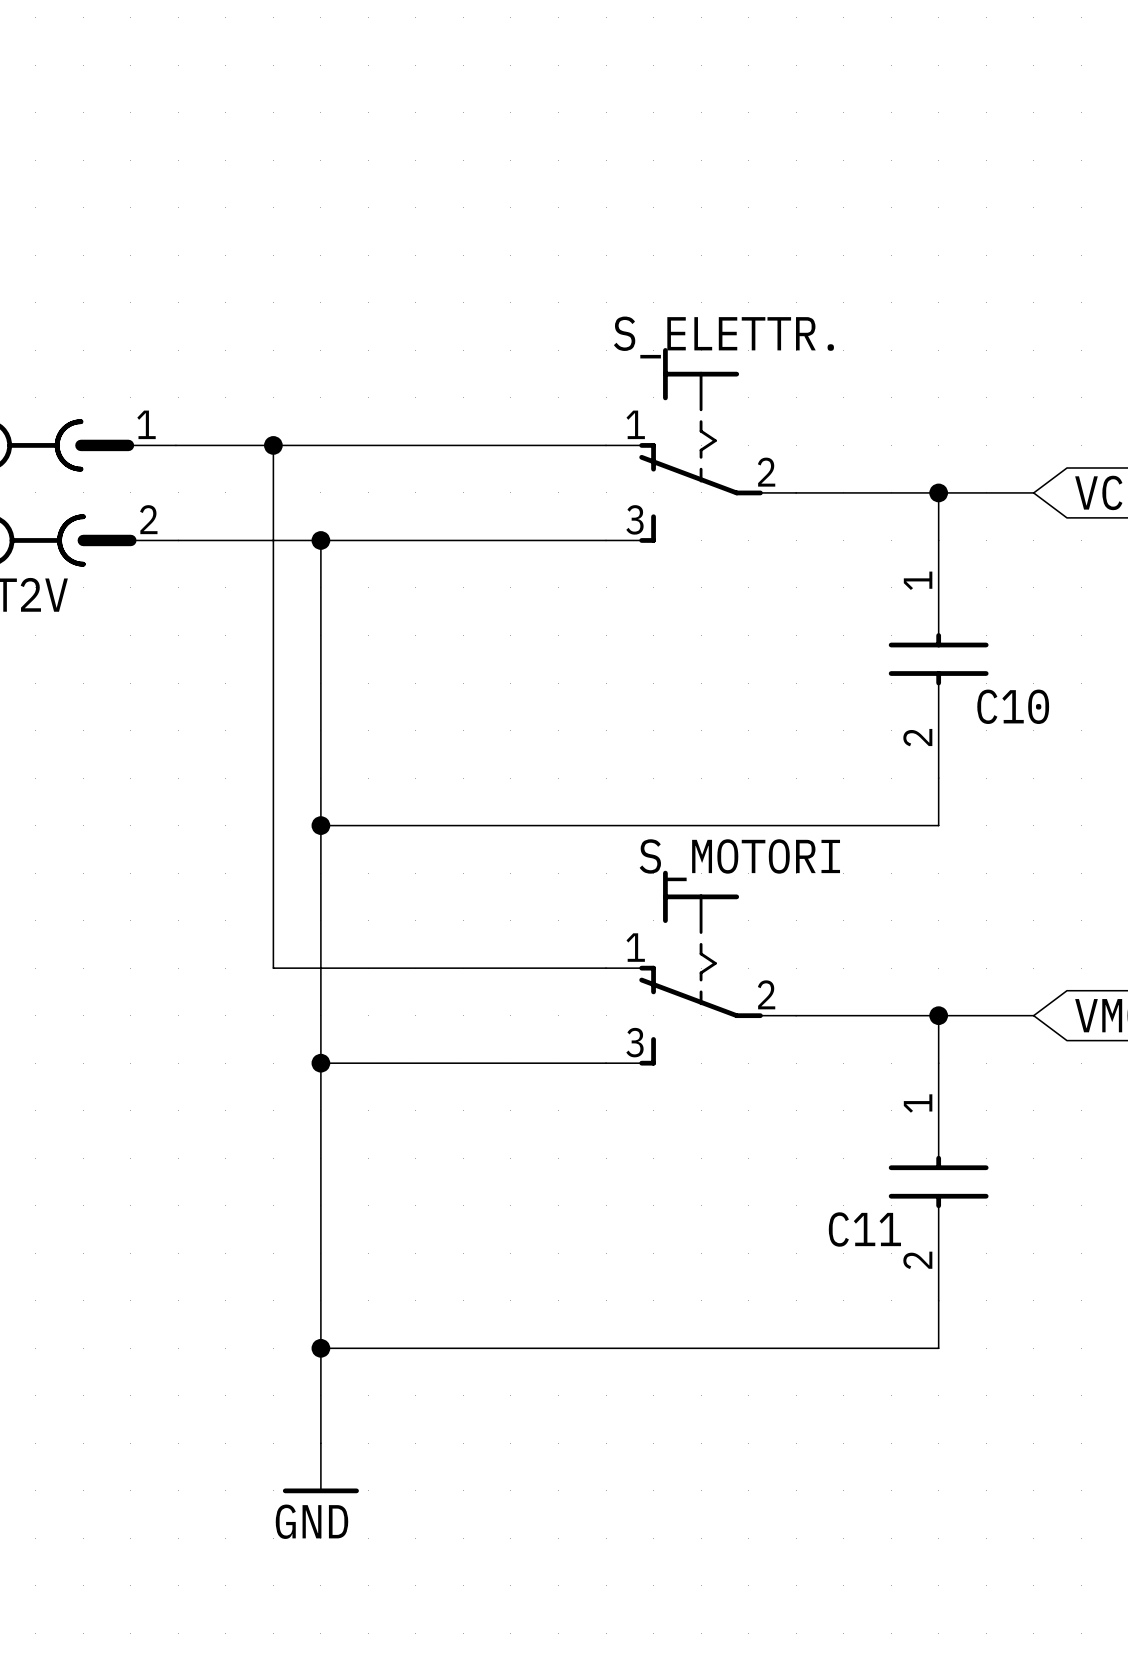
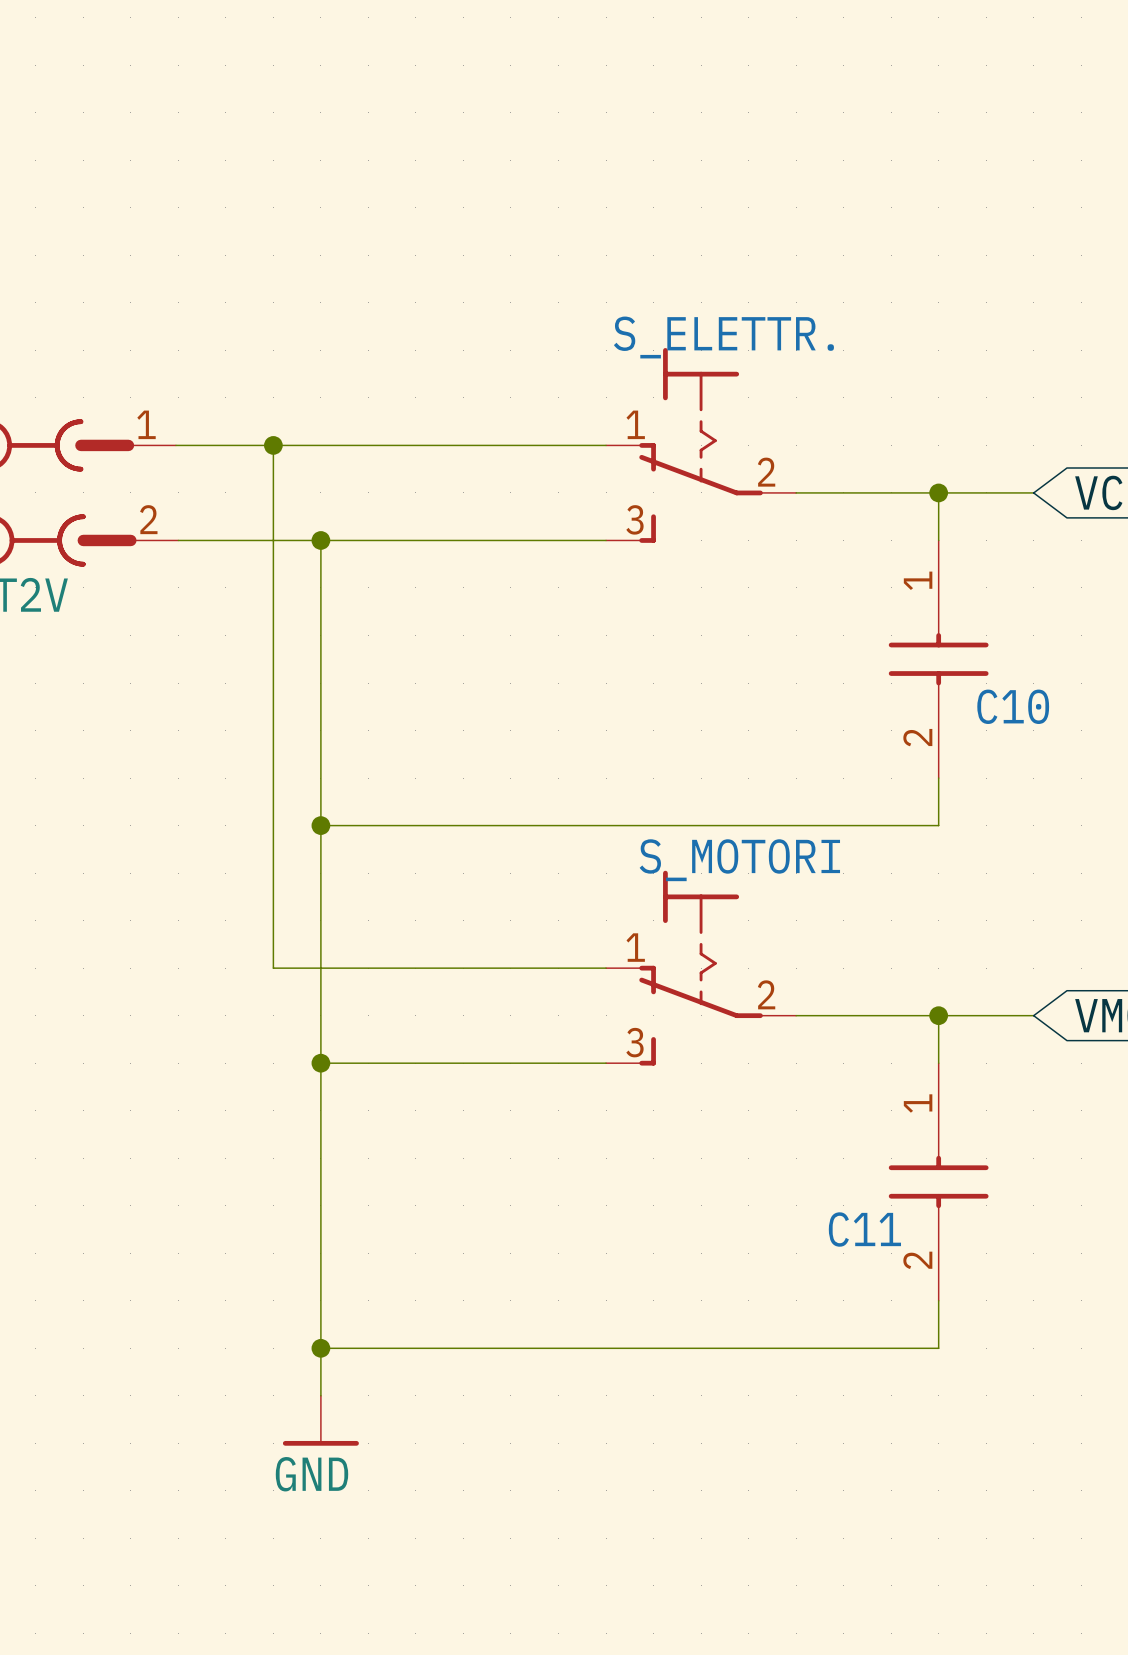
power symbol position: GND (320, 1468) -> GND (320, 1420)

